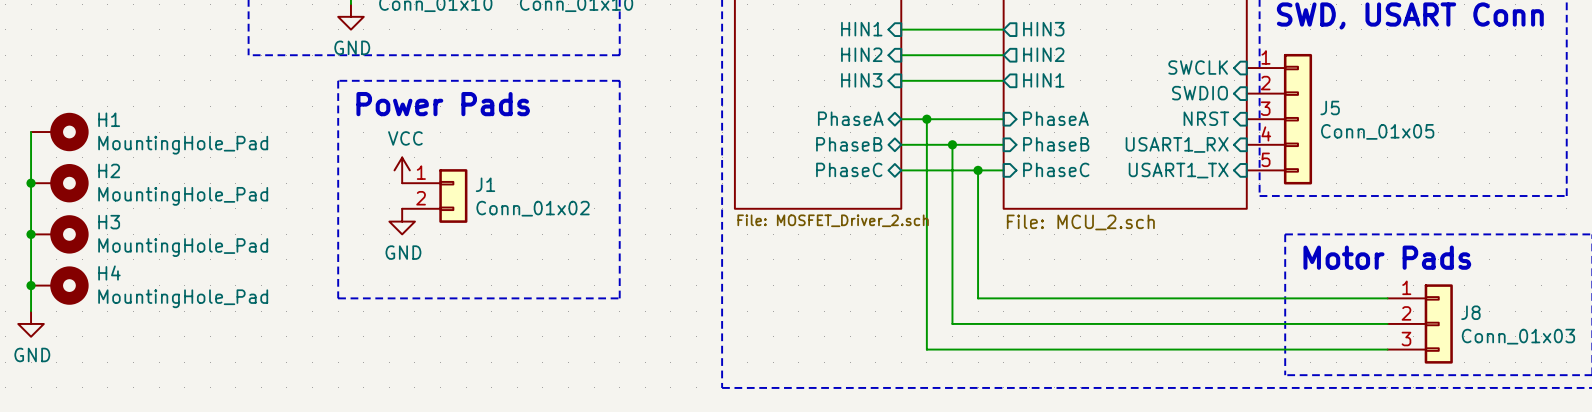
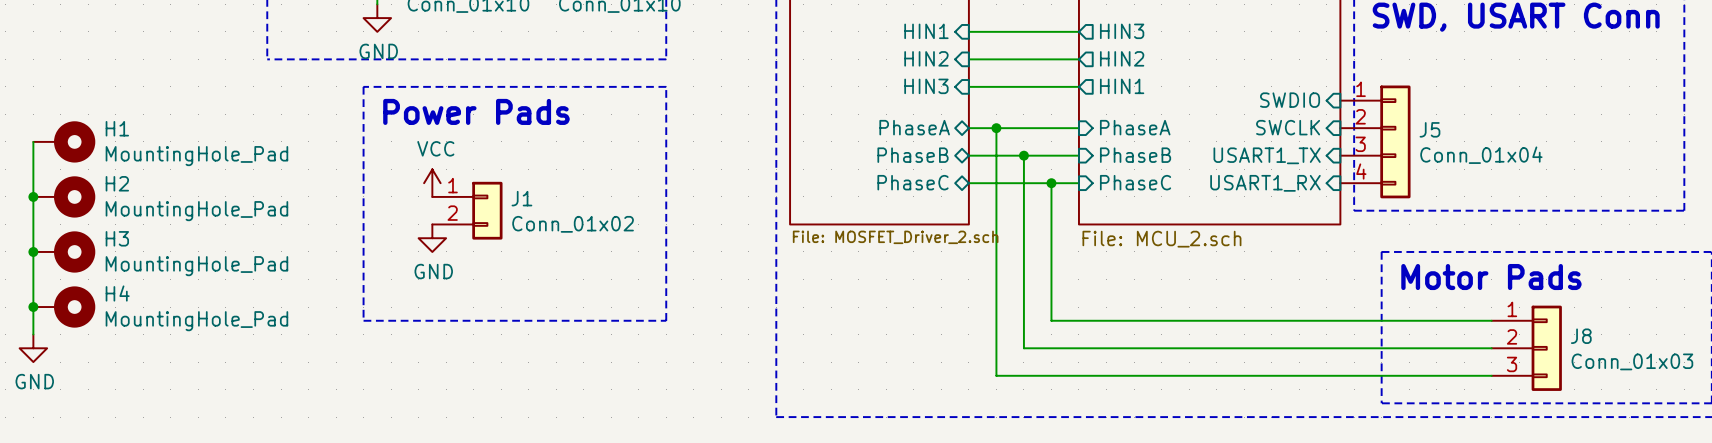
J5 symbol: [1246, 53, 1313, 185] -> [1340, 85, 1411, 199]
sheet pin: SWCLK (1198, 67) -> none
sheet pin: NRST (1206, 118) -> SWCLK (1288, 127)
J5 value: Conn_01x05 (1377, 131) -> Conn_01x04 (1481, 155)
sheet pin: USART1_RX (1177, 144) -> USART1_TX (1267, 155)
sheet pin: USART1_TX (1178, 170) -> USART1_RX (1265, 183)

